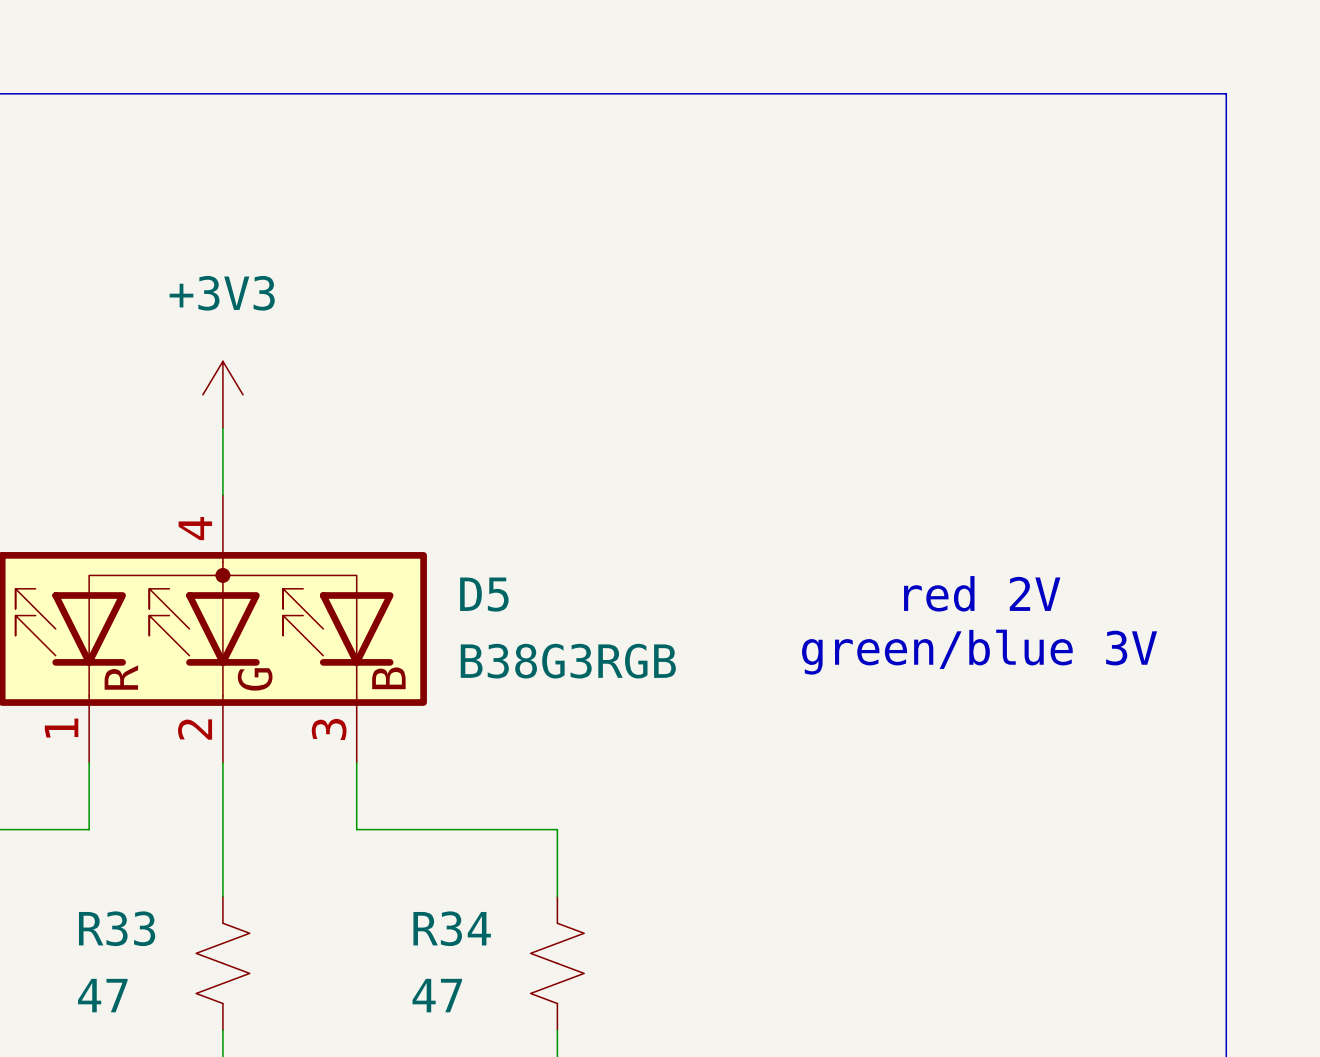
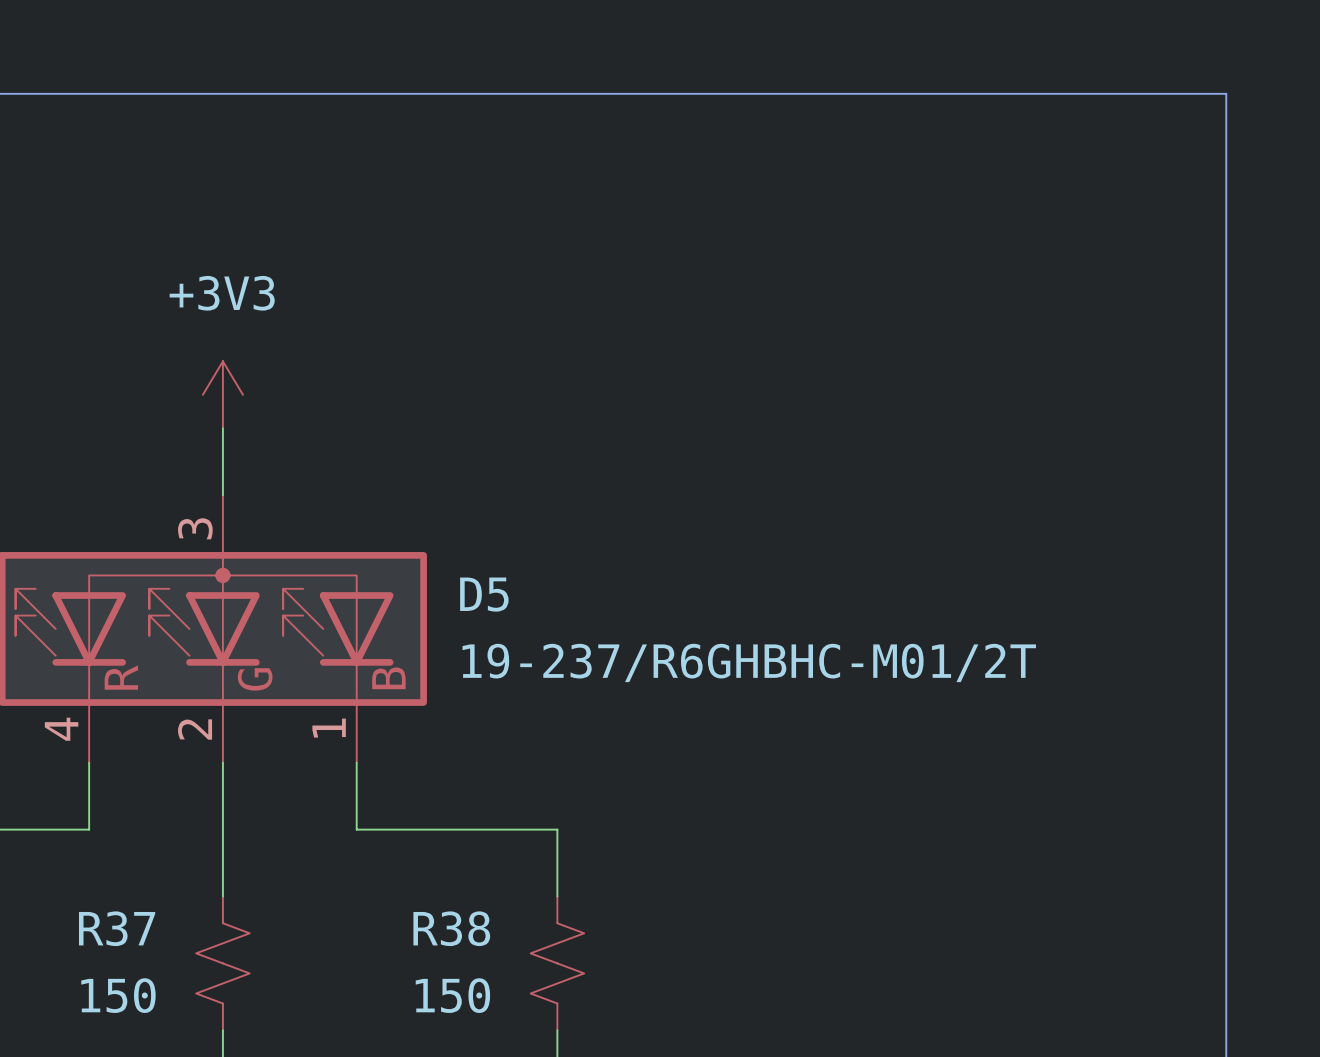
D5 pin number: 4 (195, 528) -> 3 (195, 528)
text: red 2V (982, 593) -> none
text: green/blue 3V (979, 652) -> none
D5 value: B38G3RGB (568, 661) -> 19-237/R6GHBHC-M01/2T (749, 662)
D5 pin number: 1 (61, 728) -> 4 (61, 729)
D5 pin number: 3 (329, 729) -> 1 (329, 728)
R33 name: R33 (117, 928) -> R37 (117, 928)
R34 name: R34 (452, 928) -> R38 (451, 928)
R33 value: 47 (102, 995) -> 150 (118, 995)
R34 value: 47 (437, 995) -> 150 (452, 995)

